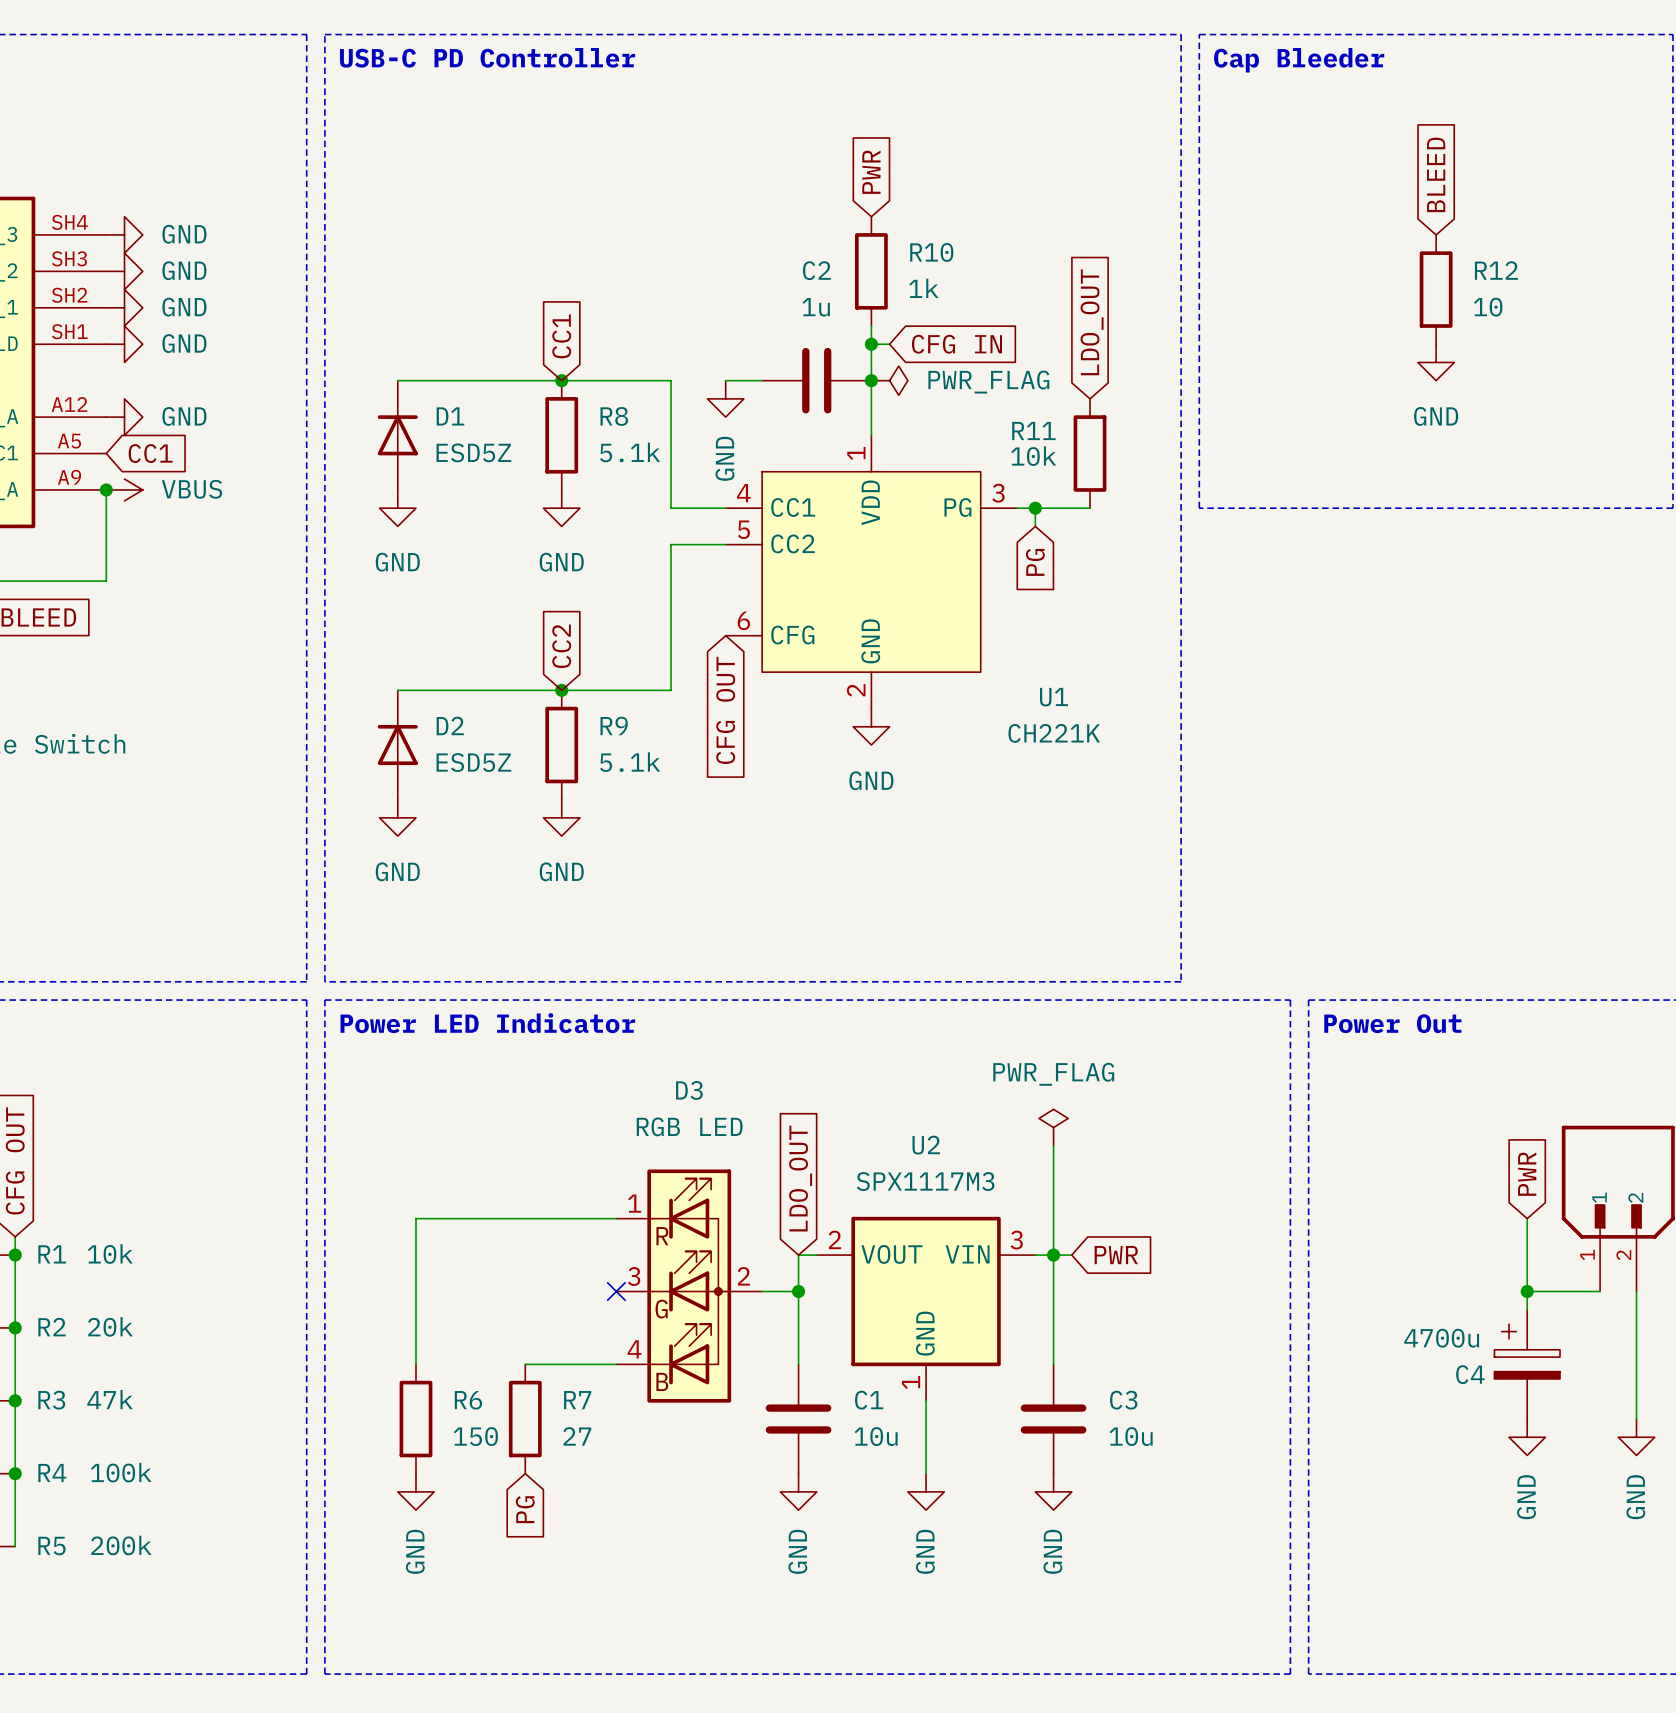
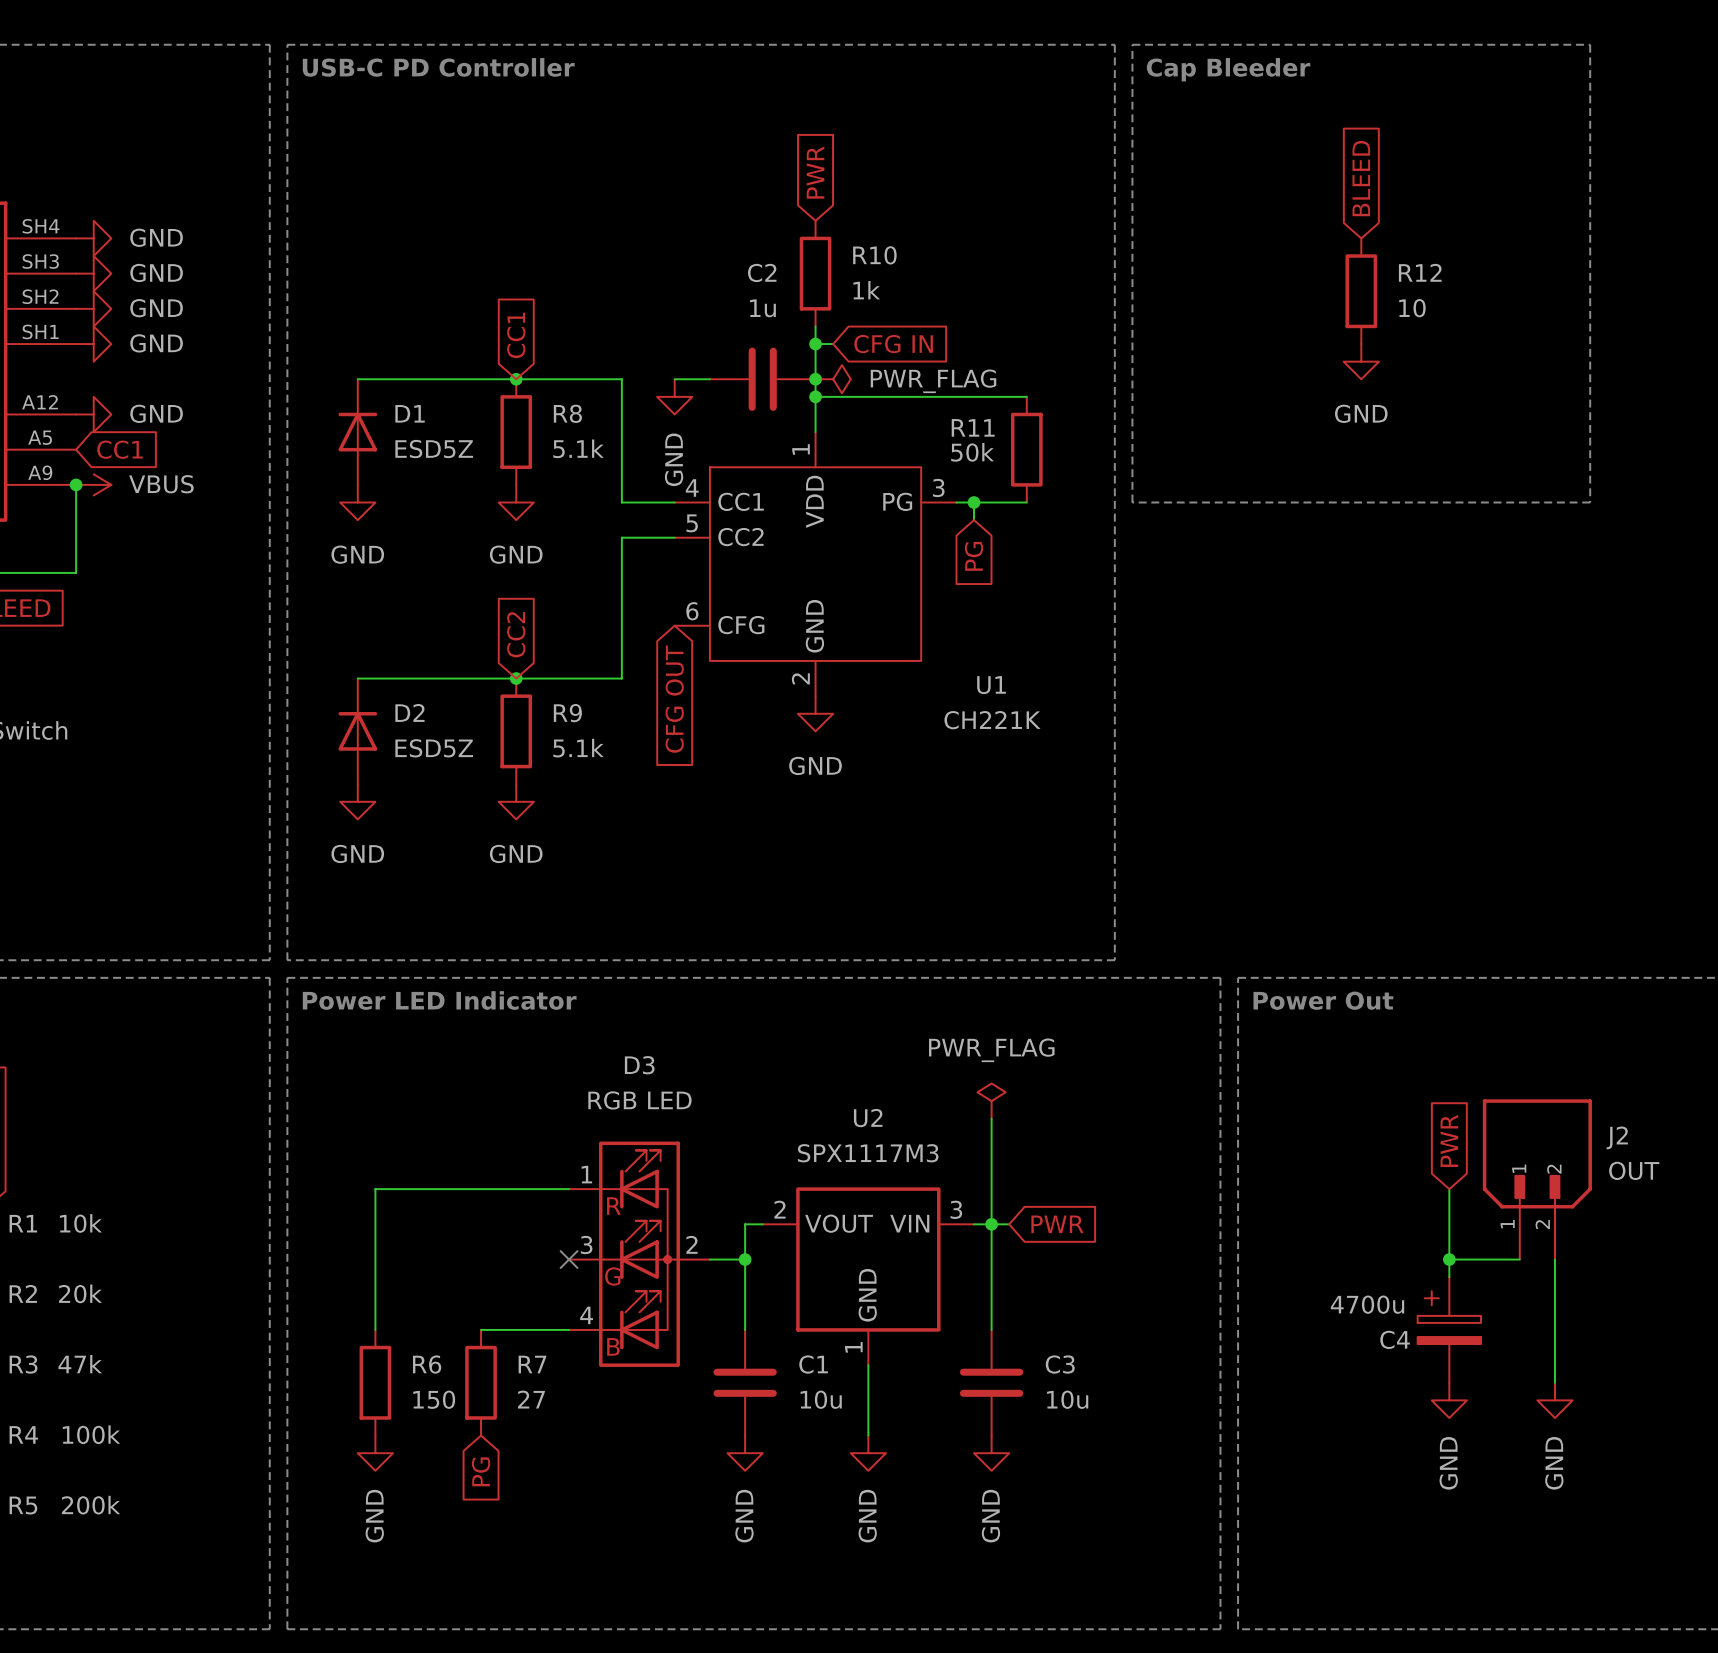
global label: LDO_OUT (1092, 322) -> none
wire: none -> (815, 396) (1026, 396)
junction: none -> (815, 396)
R11 value: 10k (1033, 456) -> 50k (972, 452)
global label: LDO_OUT (800, 1178) -> none

